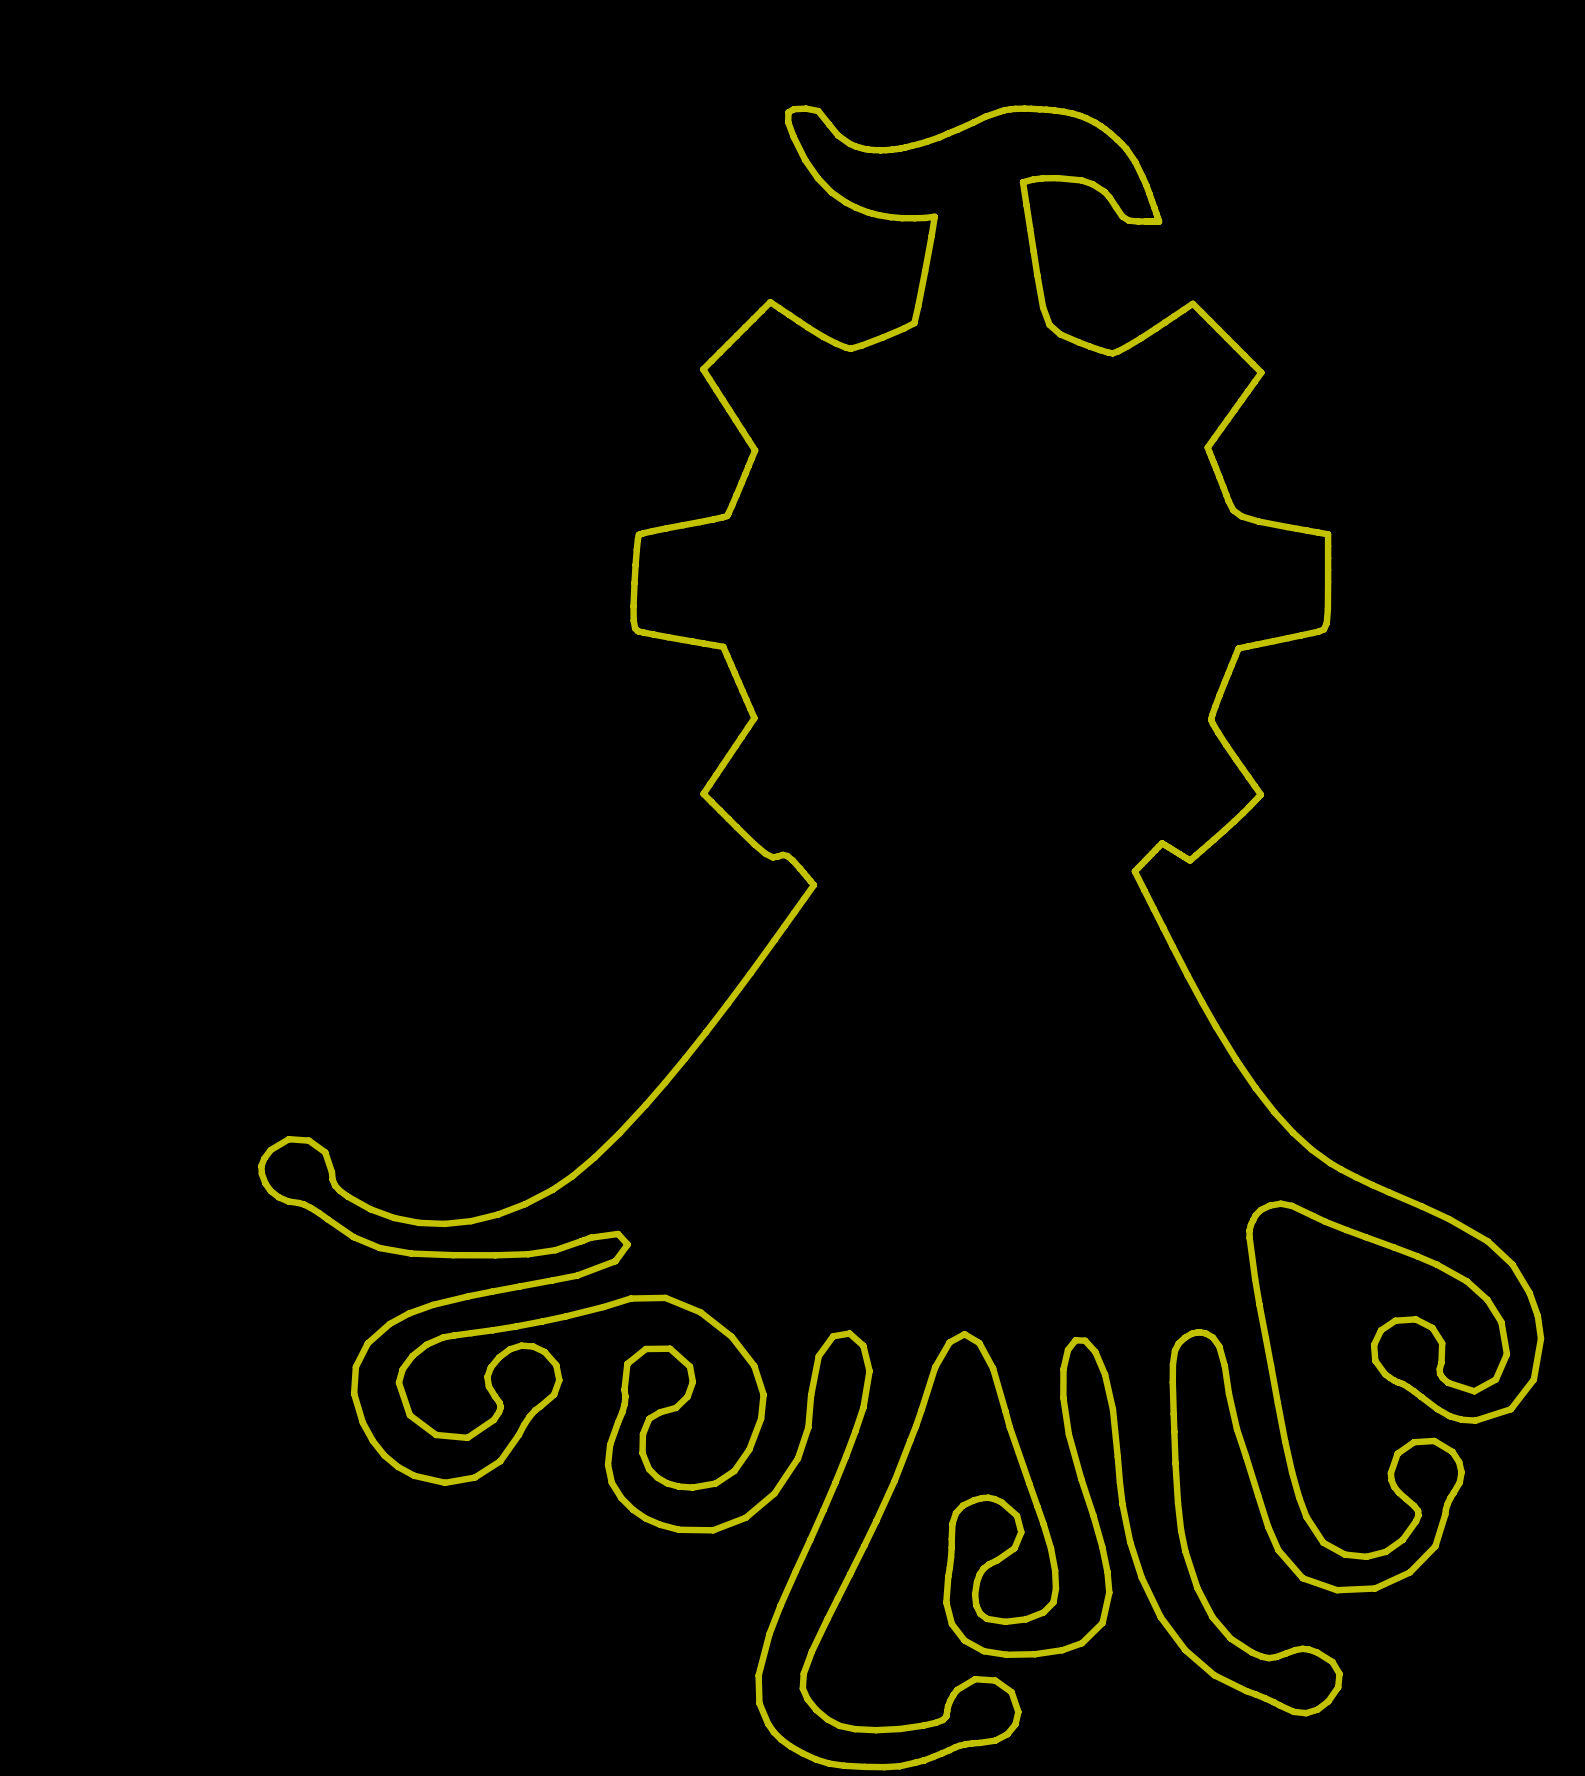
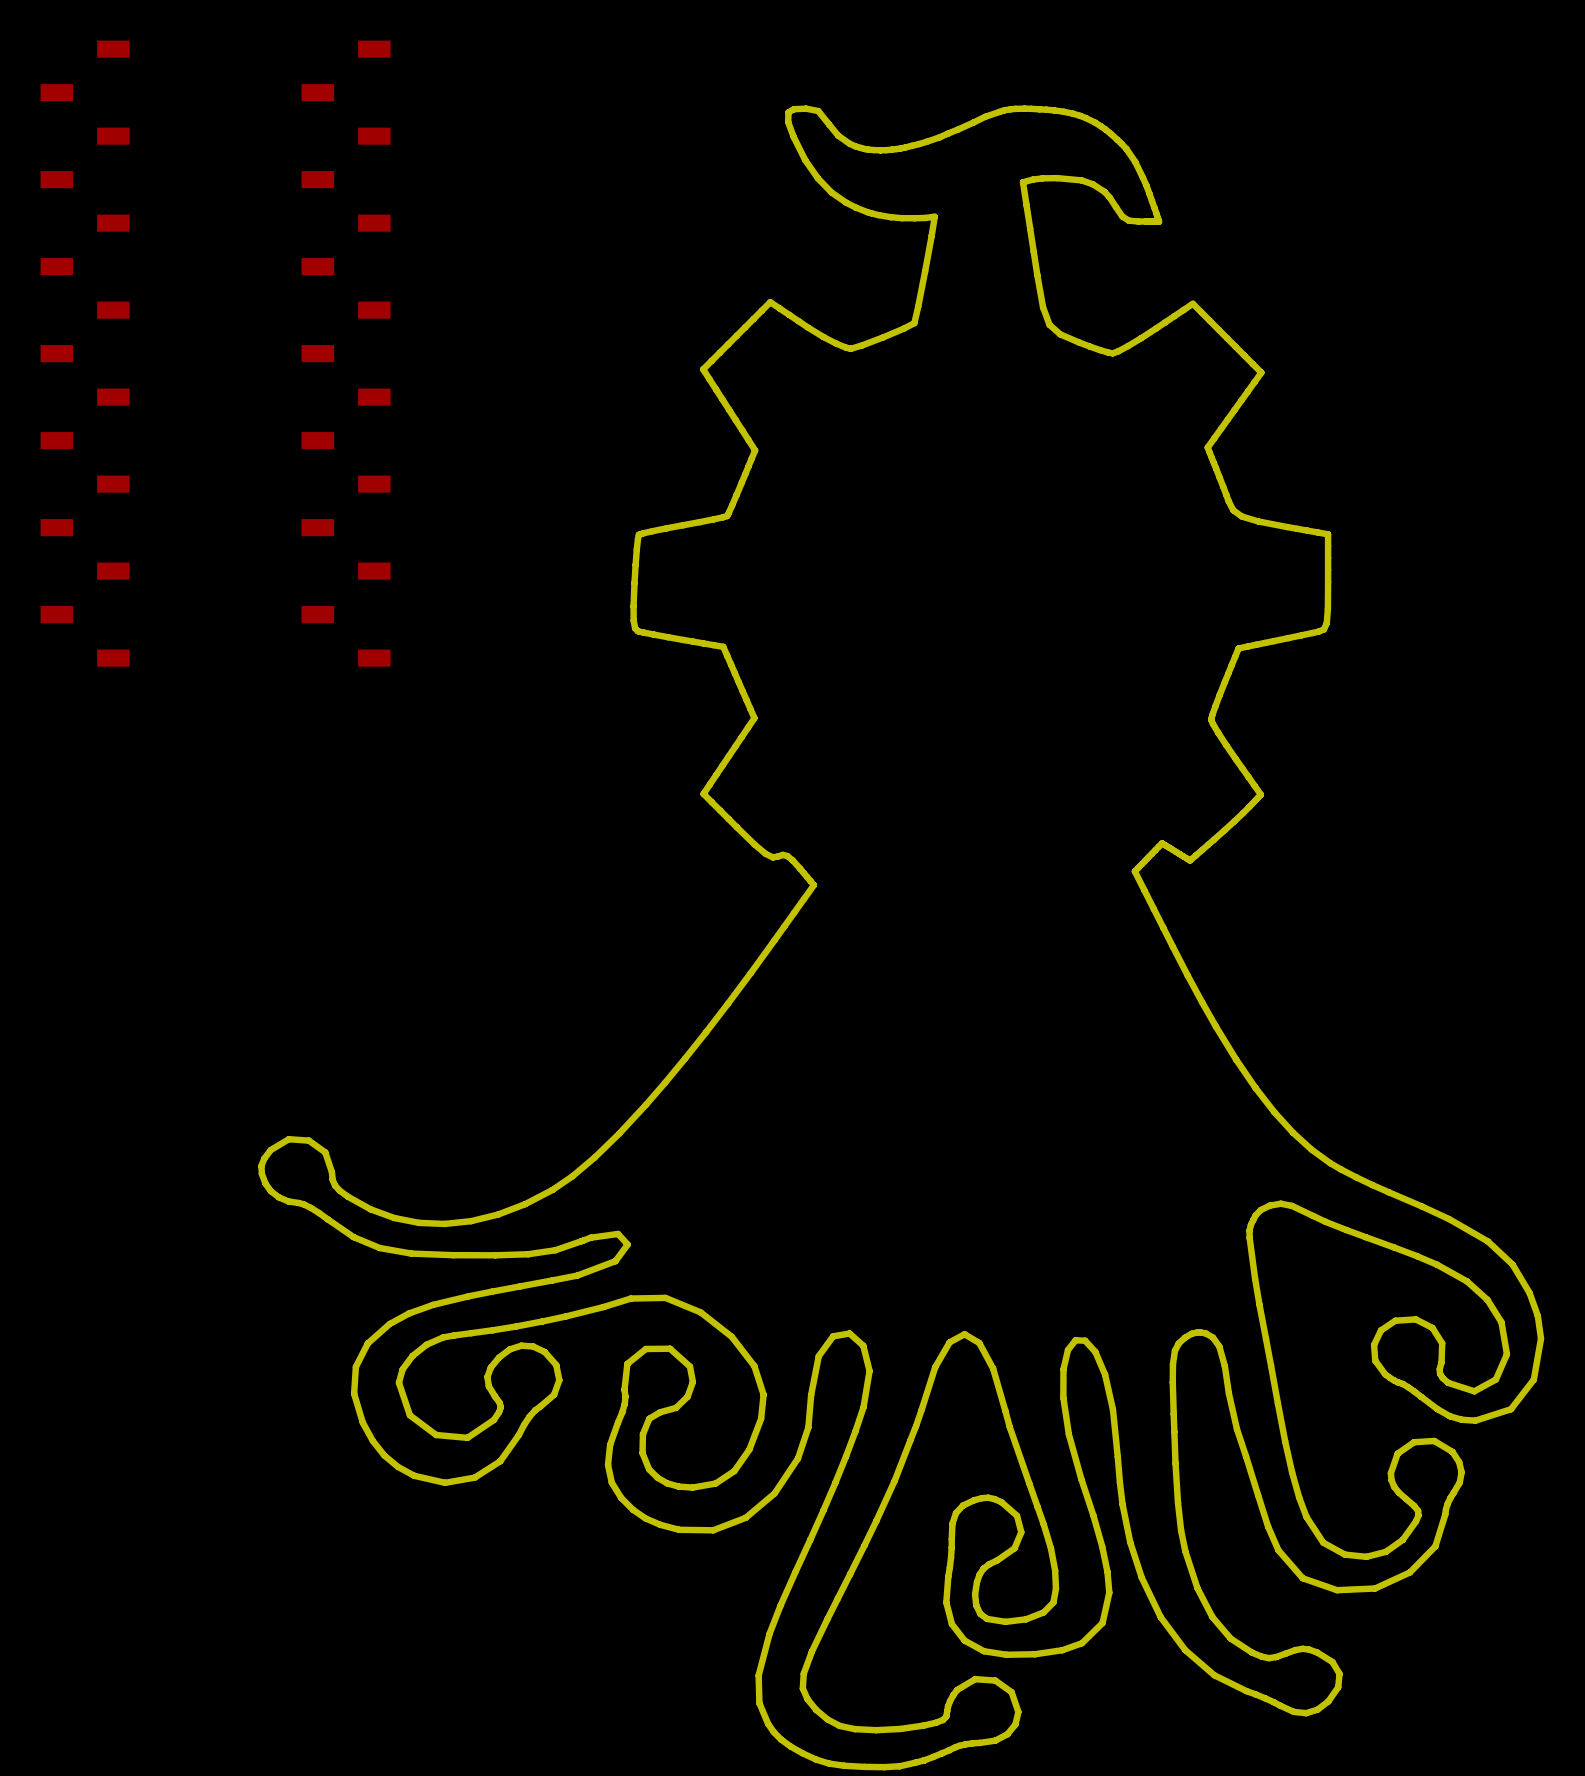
part: none -> (85, 353)
part: none -> (346, 353)

